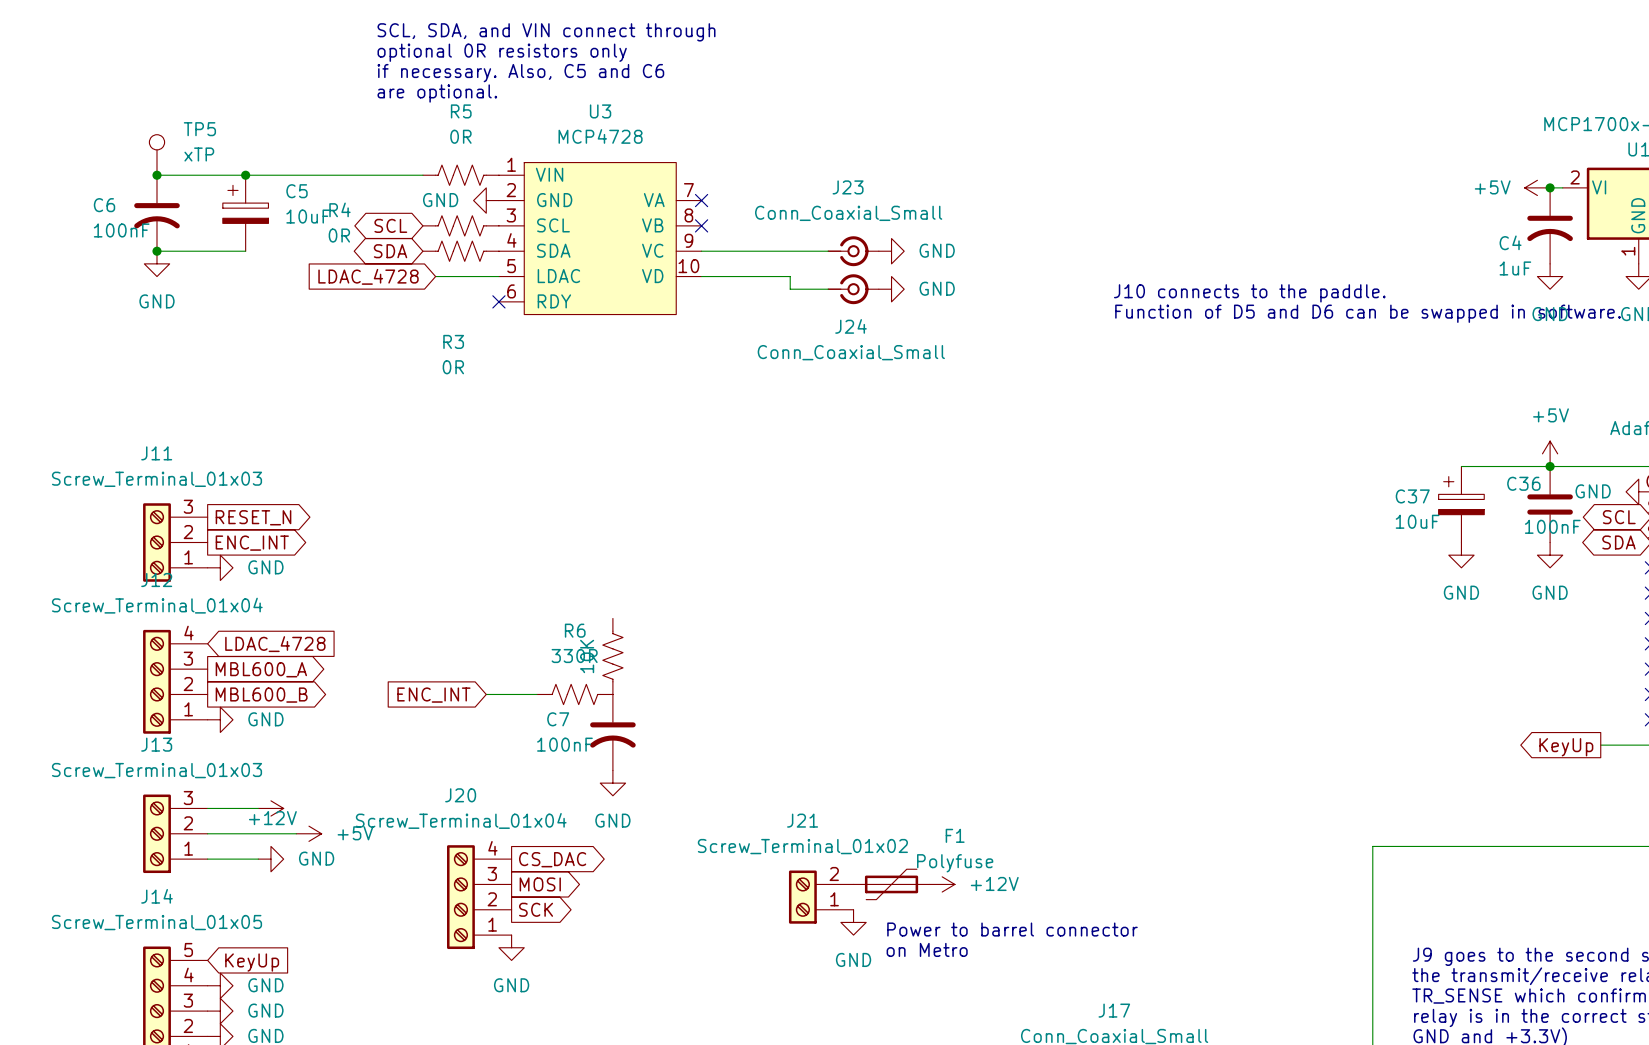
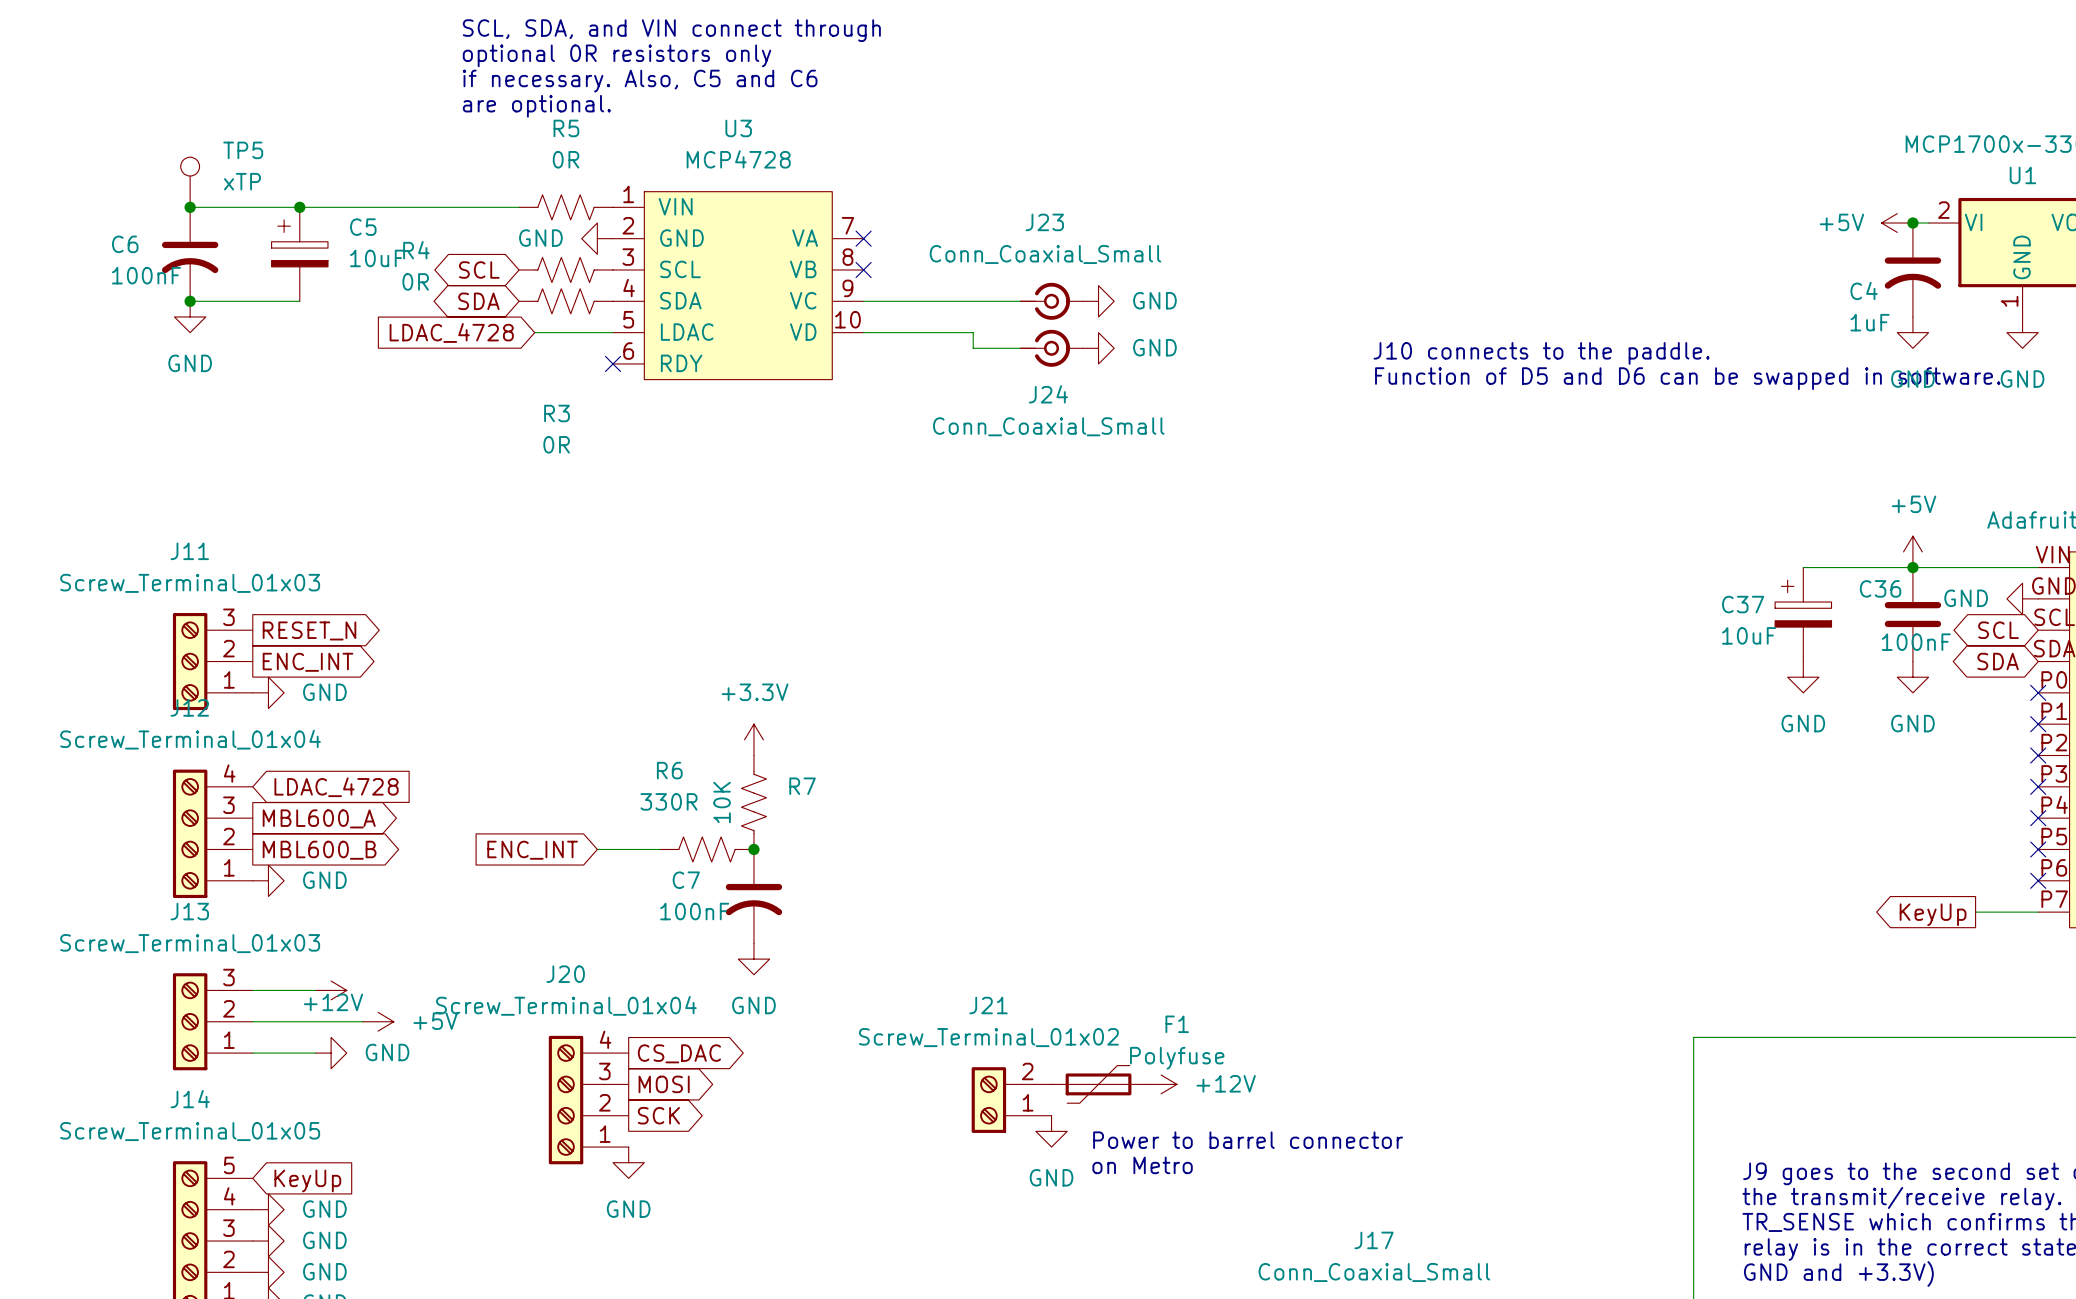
power symbol: none -> +3.3V (753, 739)
R6 name position: R6 (575, 630) -> R6 (669, 770)
R7 name: none -> R7 (802, 786)
R6 value position: 330R (574, 656) -> 330R (669, 801)
junction: none -> (753, 849)

